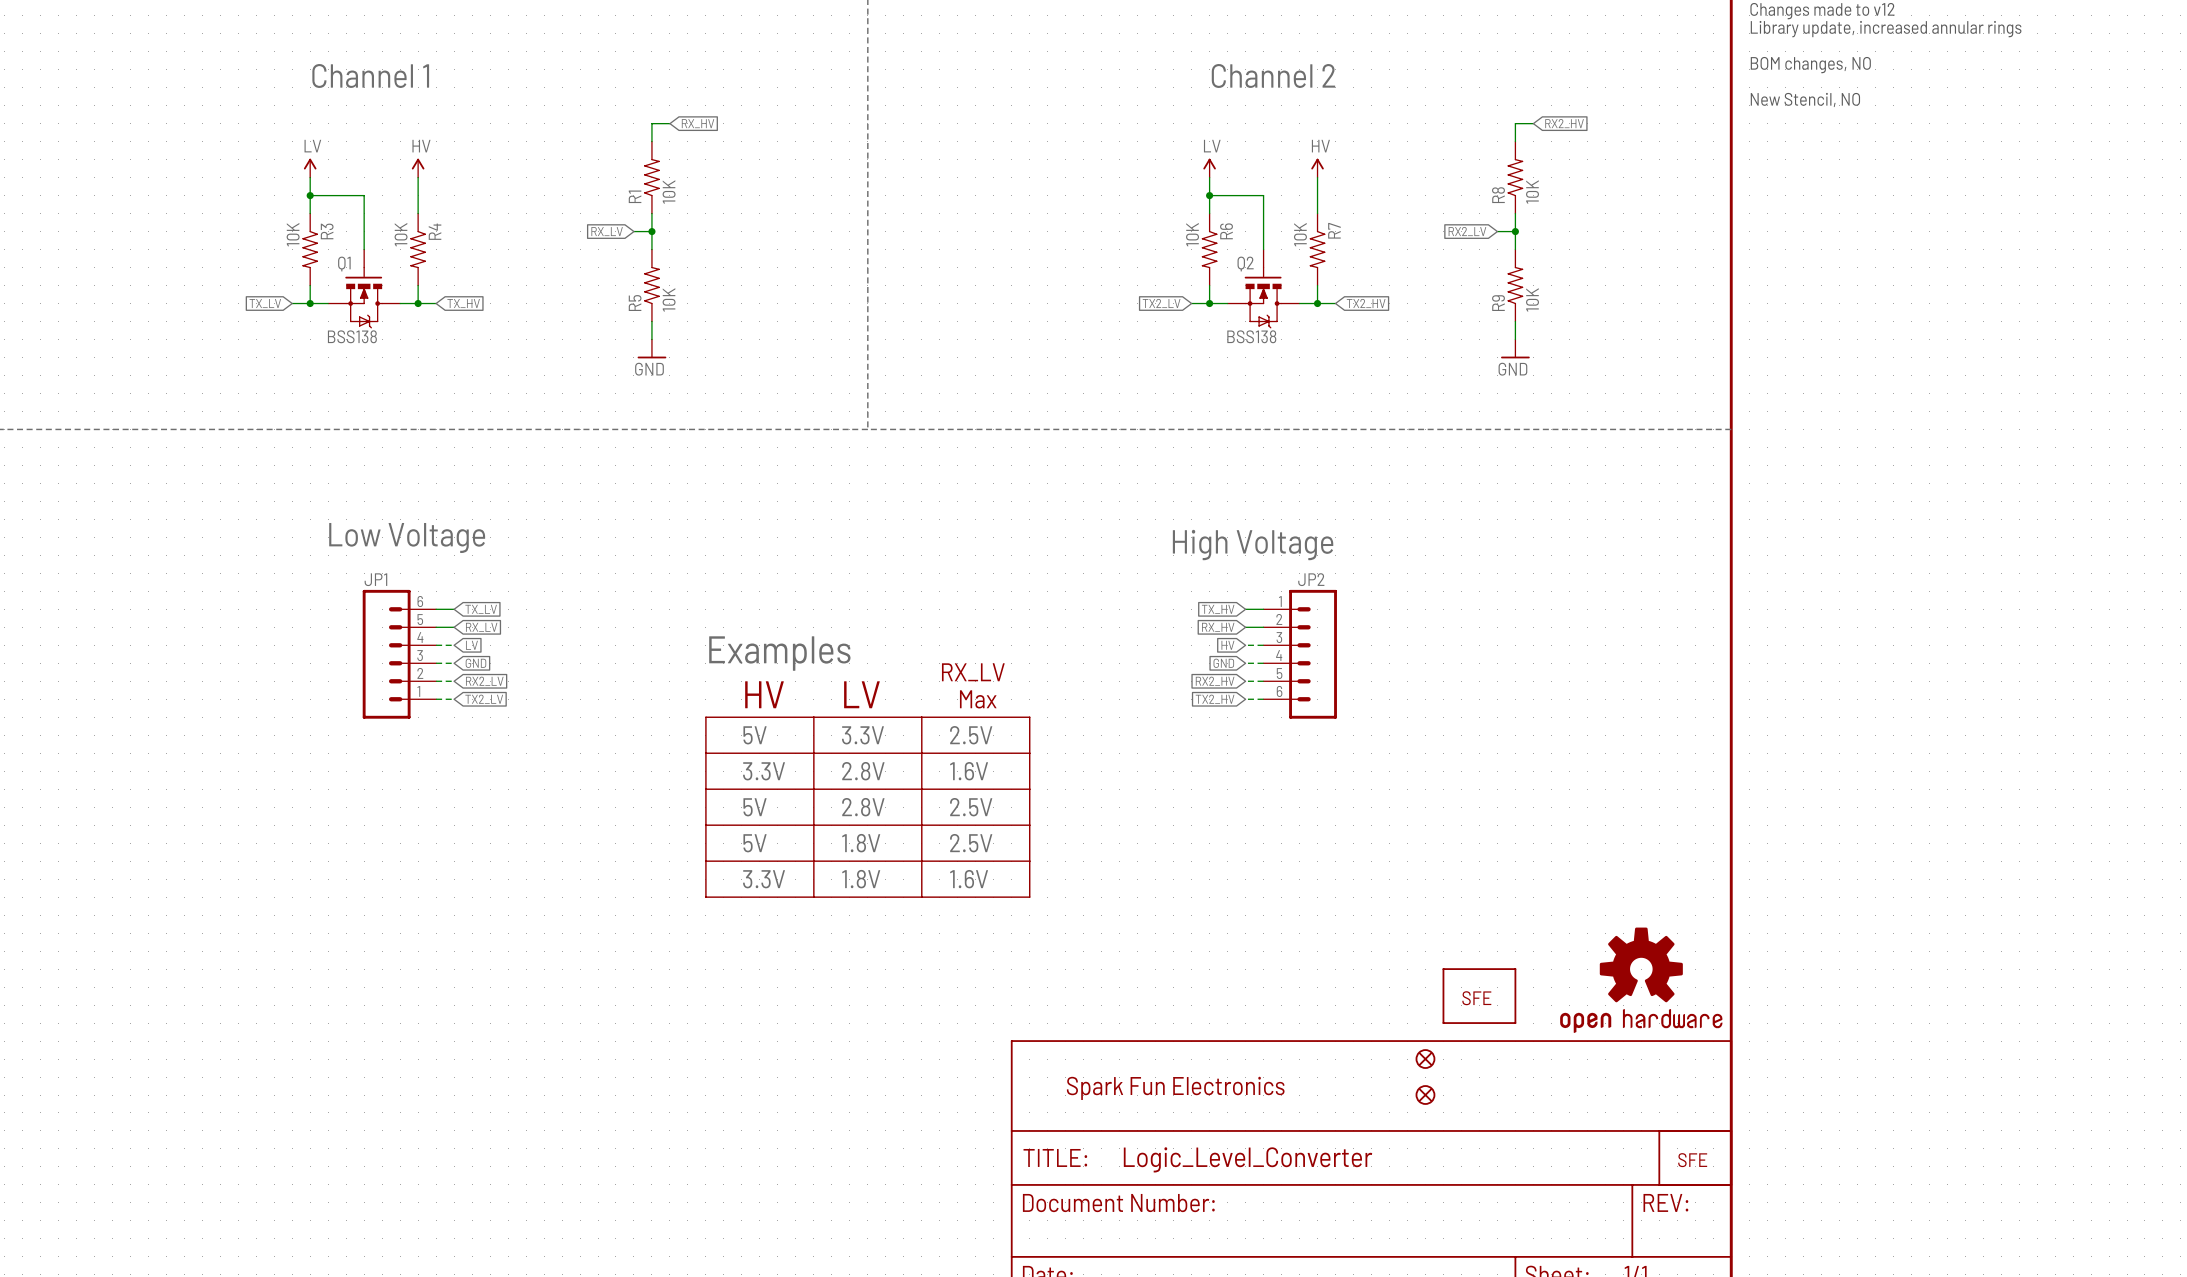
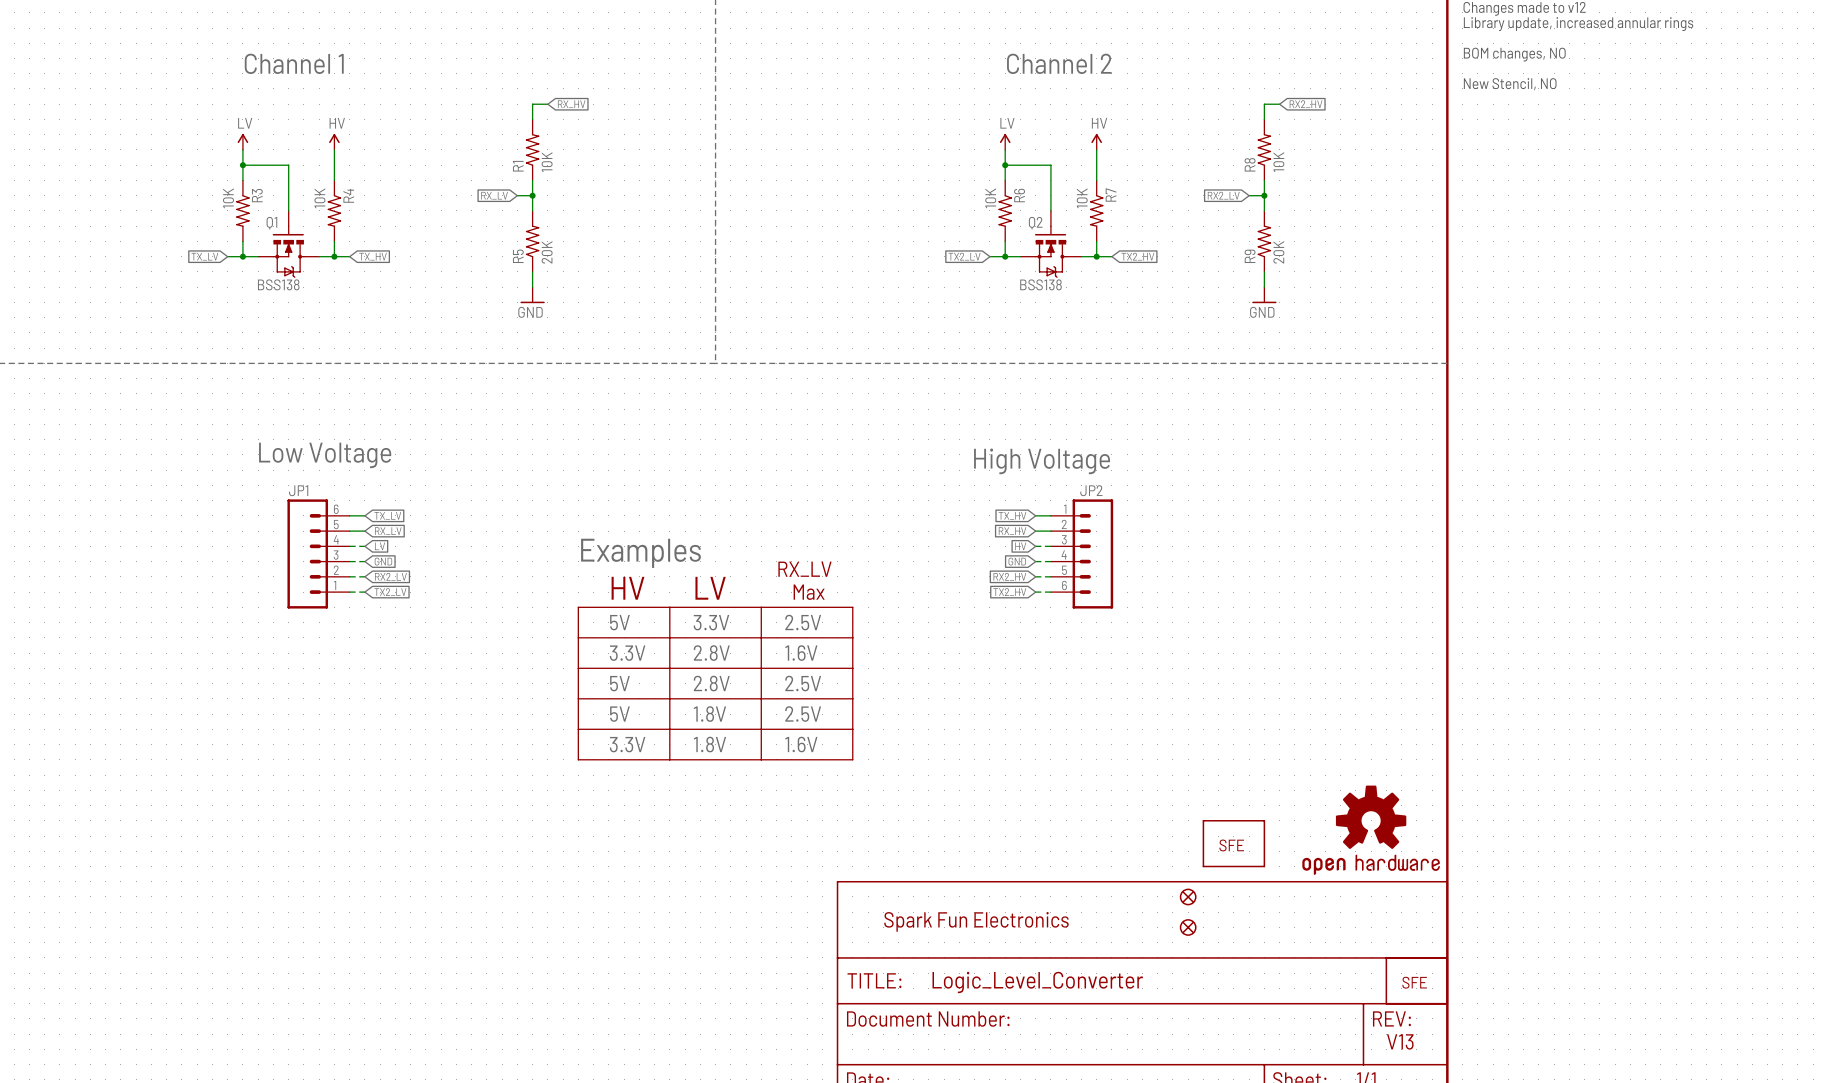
R5 value: 10K (669, 299) -> 20K (547, 252)
R9 value: 10K (1532, 299) -> 20K (1278, 252)
text: none -> V13 (1400, 1041)

